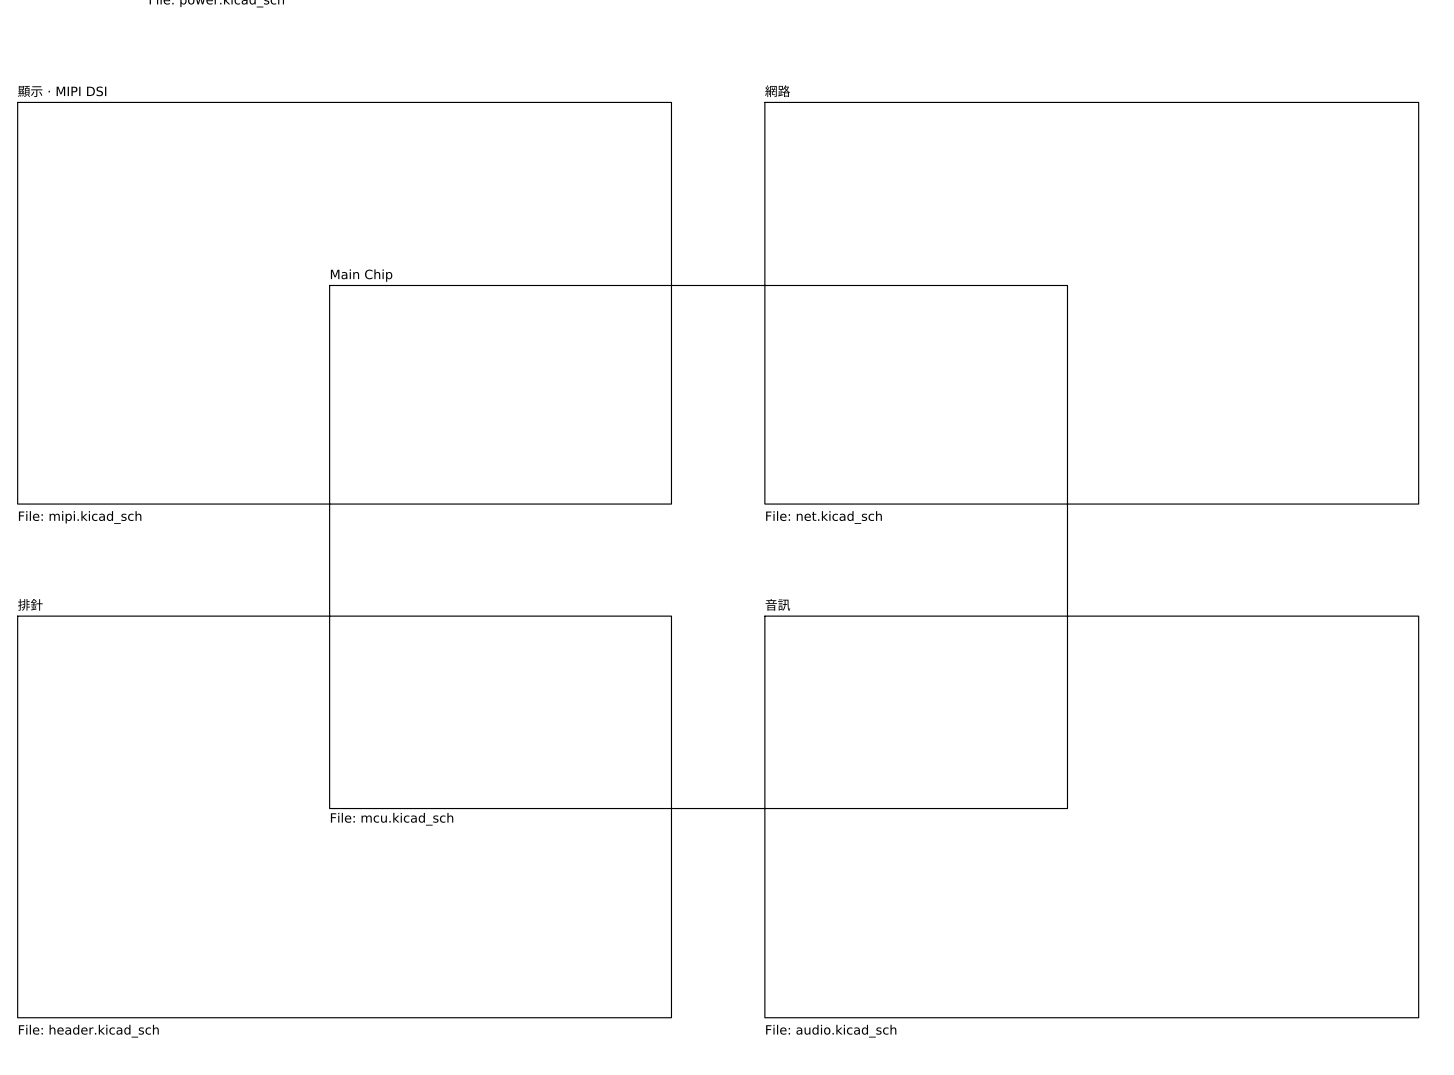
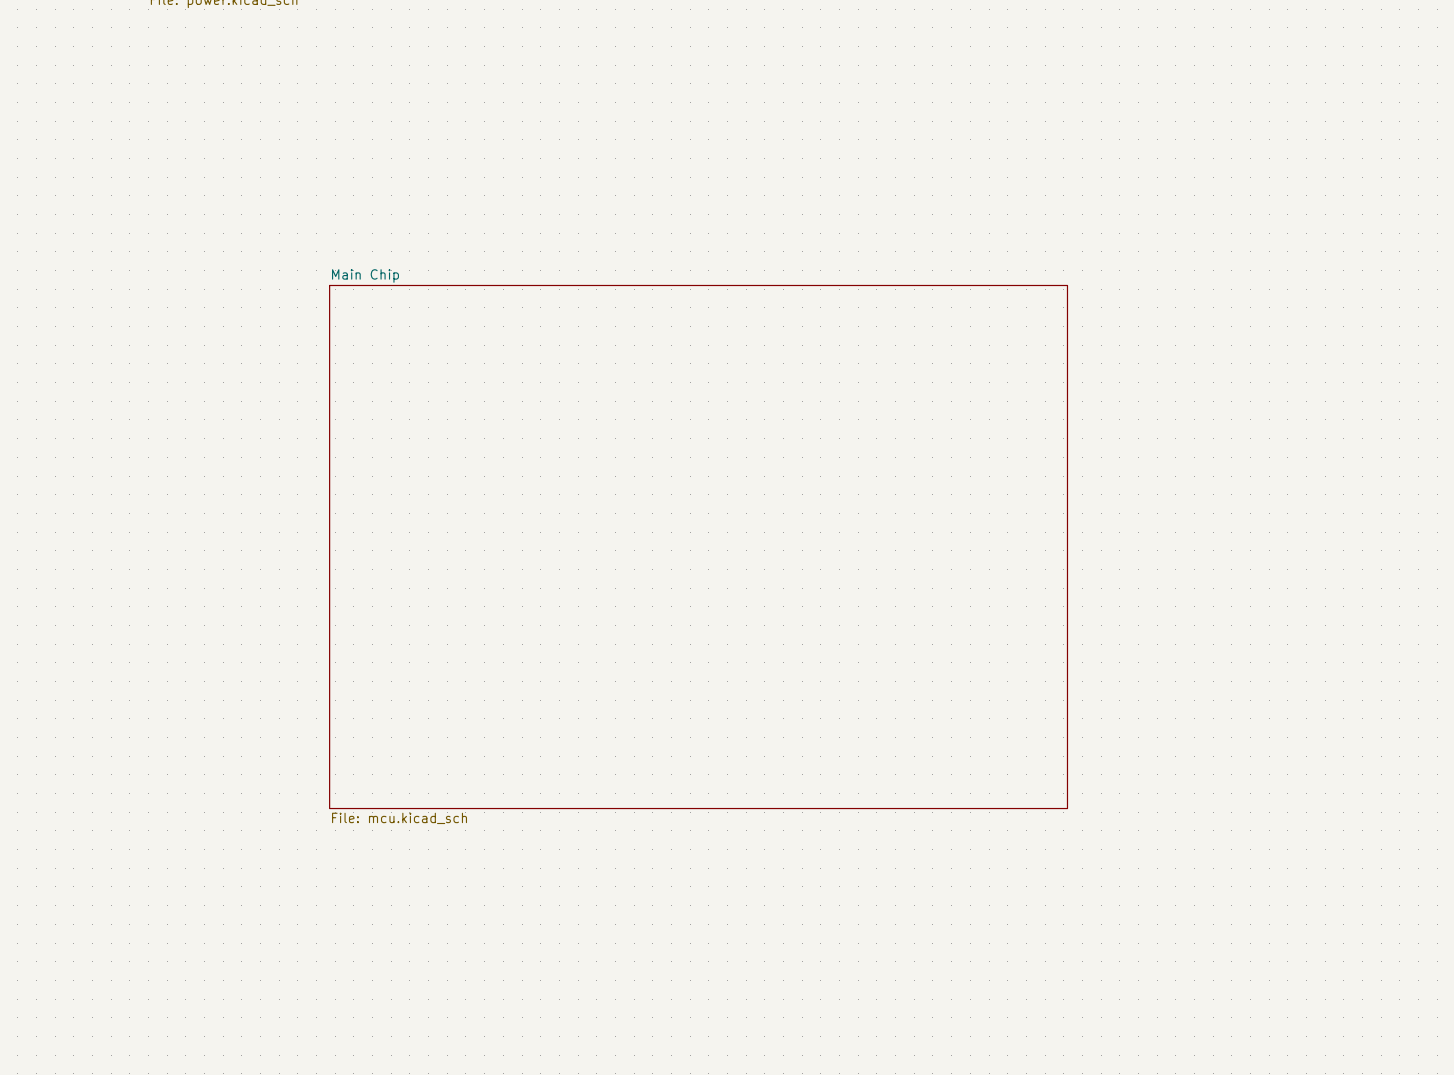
sheet 顯示 · MIPI DSI: File: mipi.kicad_sch (344, 303) -> none
sheet 網路: File: net.kicad_sch (1091, 303) -> none
sheet 排針: File: header.kicad_sch (344, 816) -> none
sheet 音訊: File: audio.kicad_sch (1091, 816) -> none

